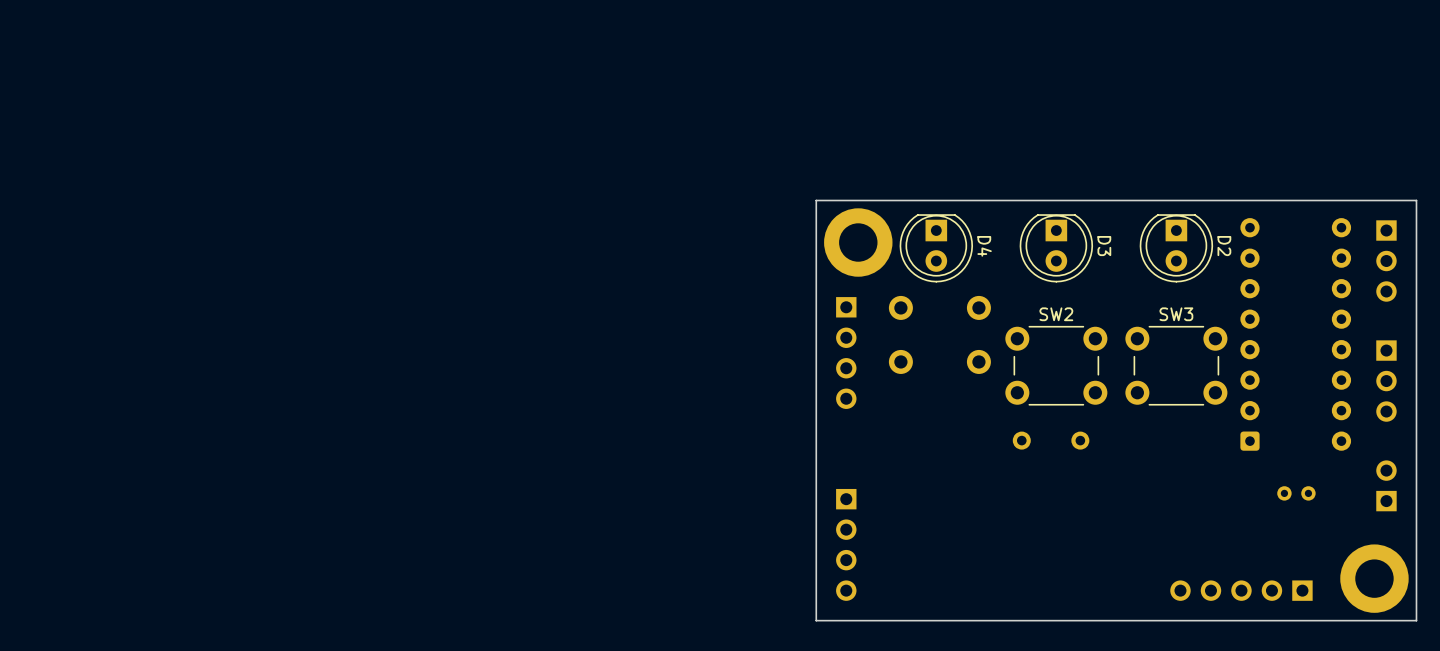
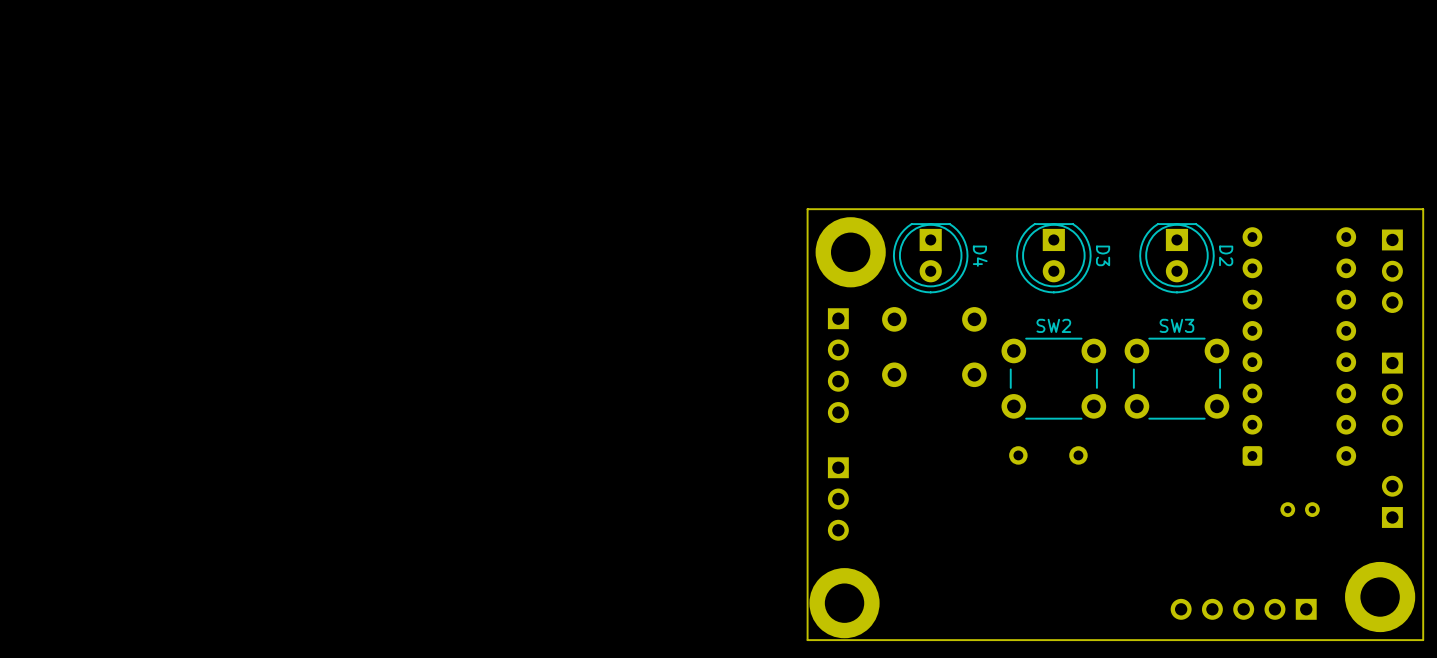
part: none -> (838, 499)
part: (846, 544) -> none
part: none -> (844, 603)

